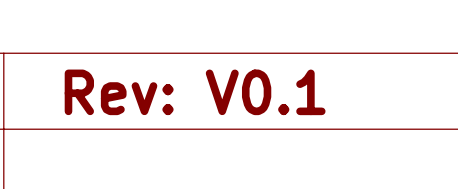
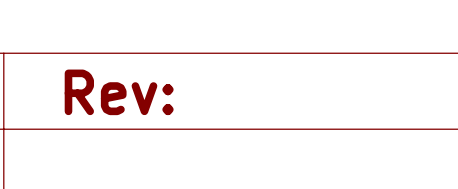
title block: Rev: V0.1 (195, 92) -> Rev: (119, 92)

